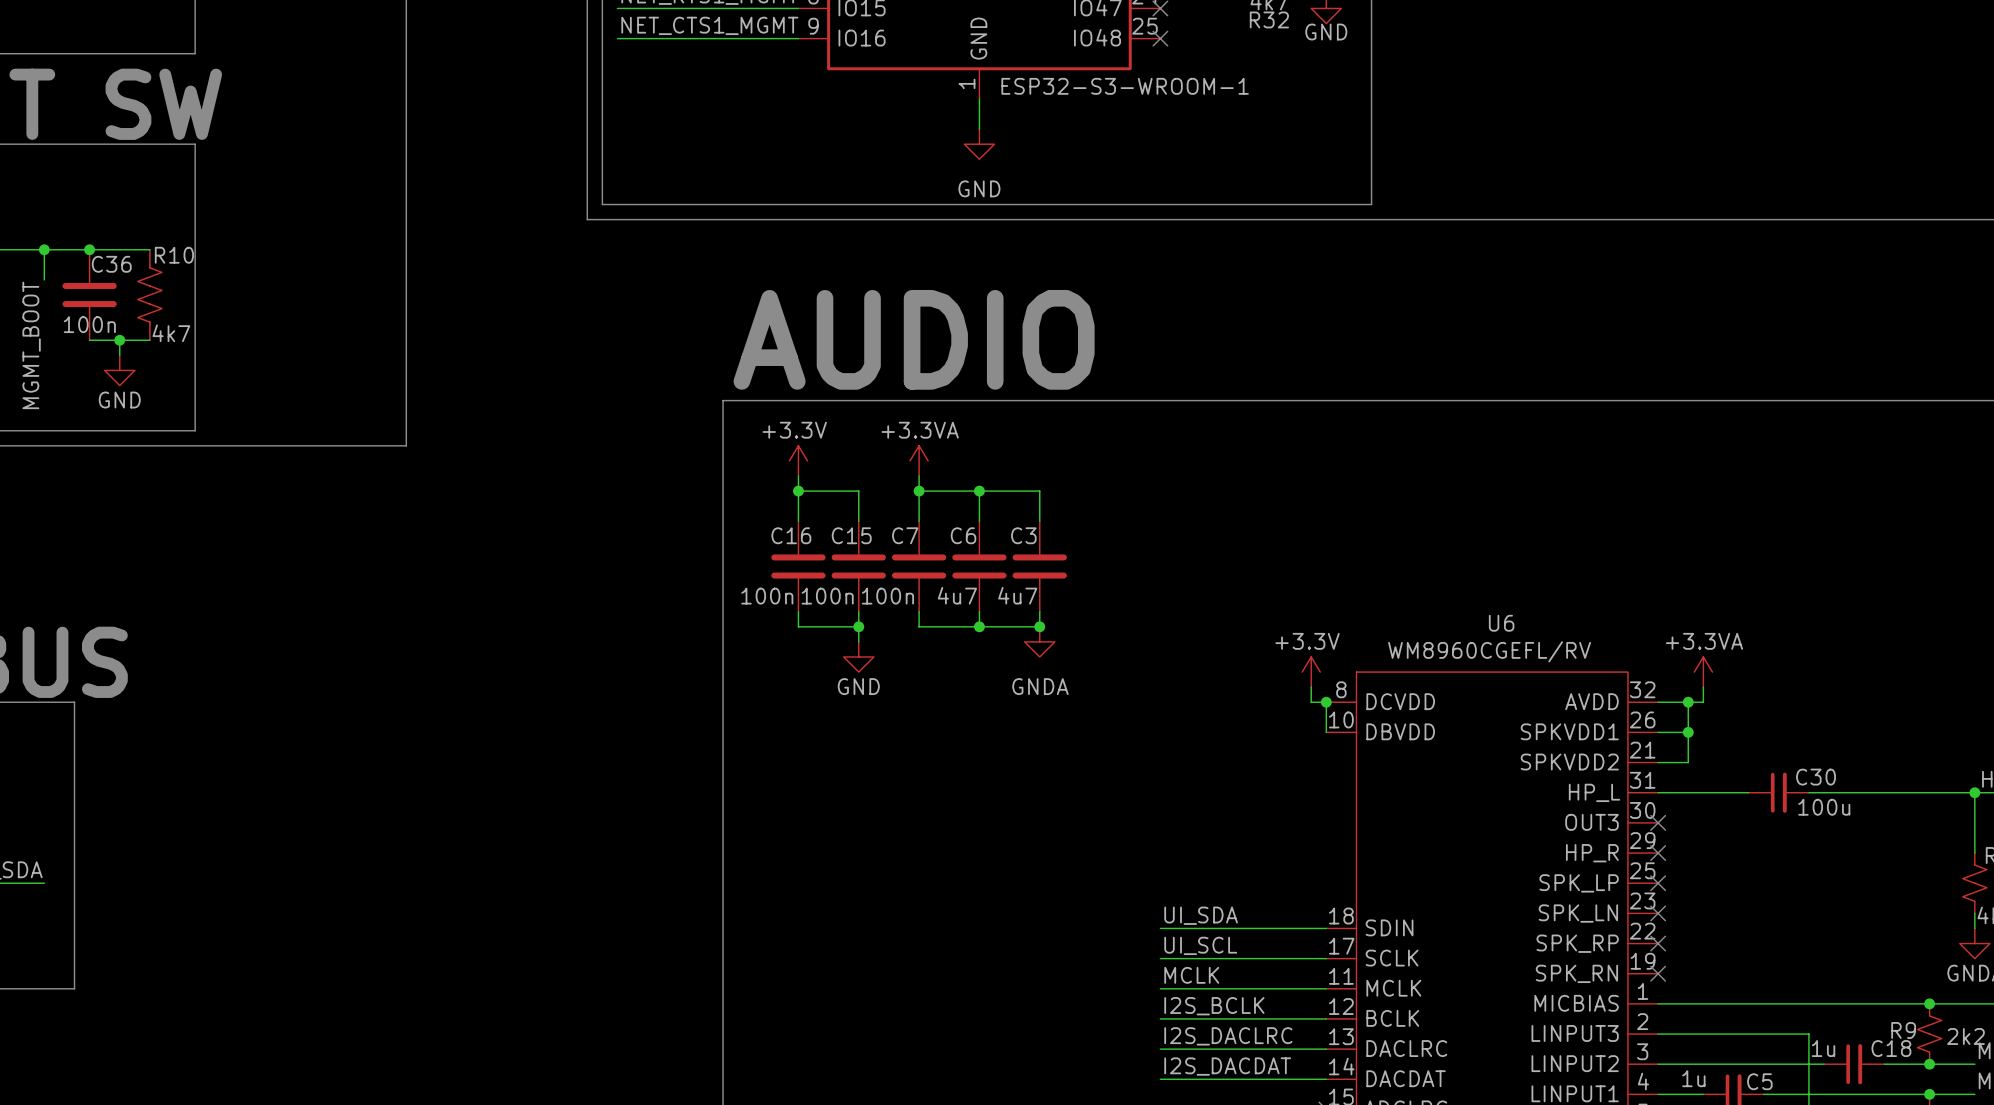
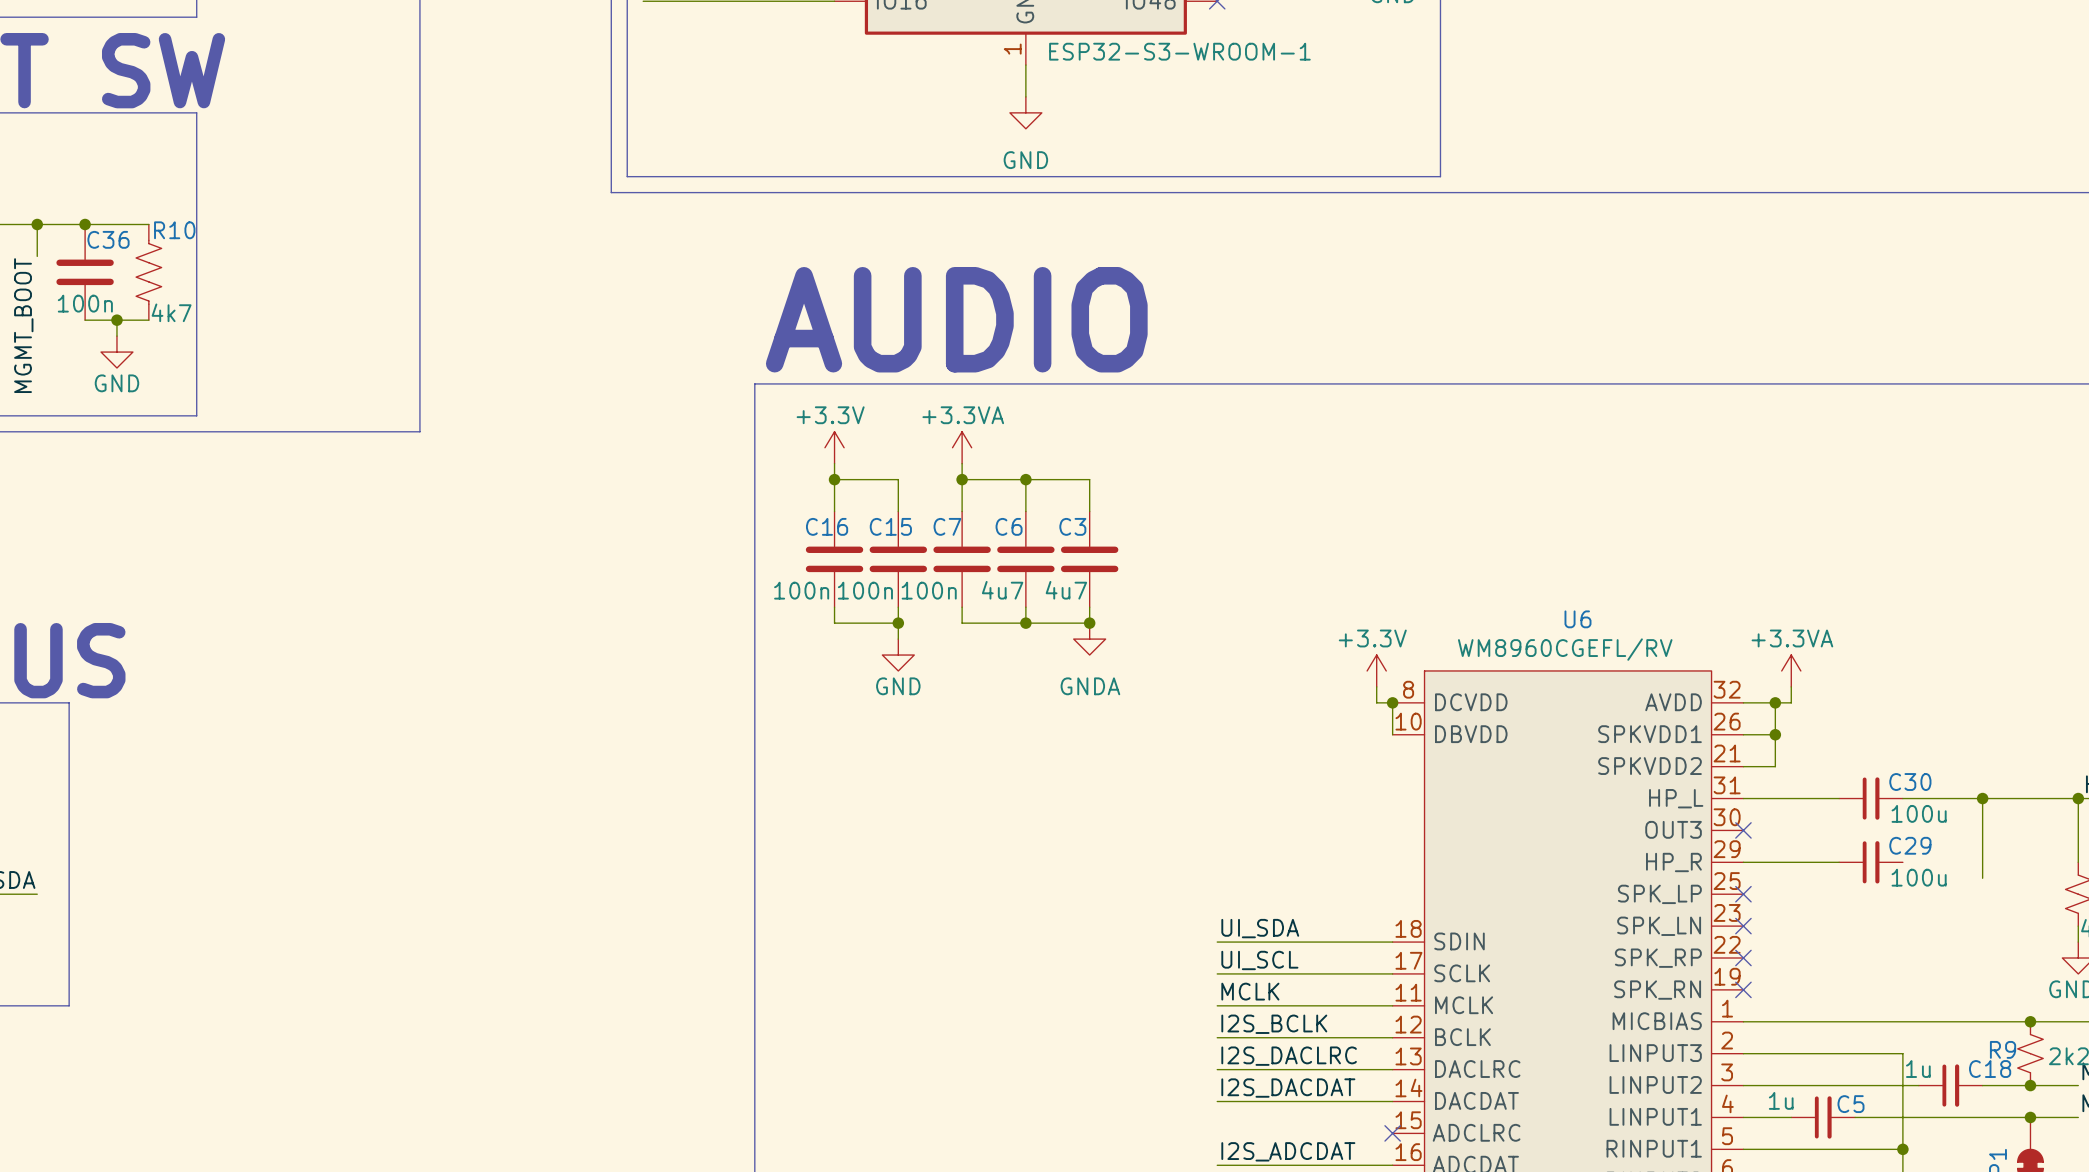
wire: none -> (1982, 798) (1982, 878)
junction: none -> (1982, 798)
wire: none -> (1743, 862) (1839, 862)
no-connect mark: (1658, 853) -> none
C29: none -> 100u (1871, 862)

